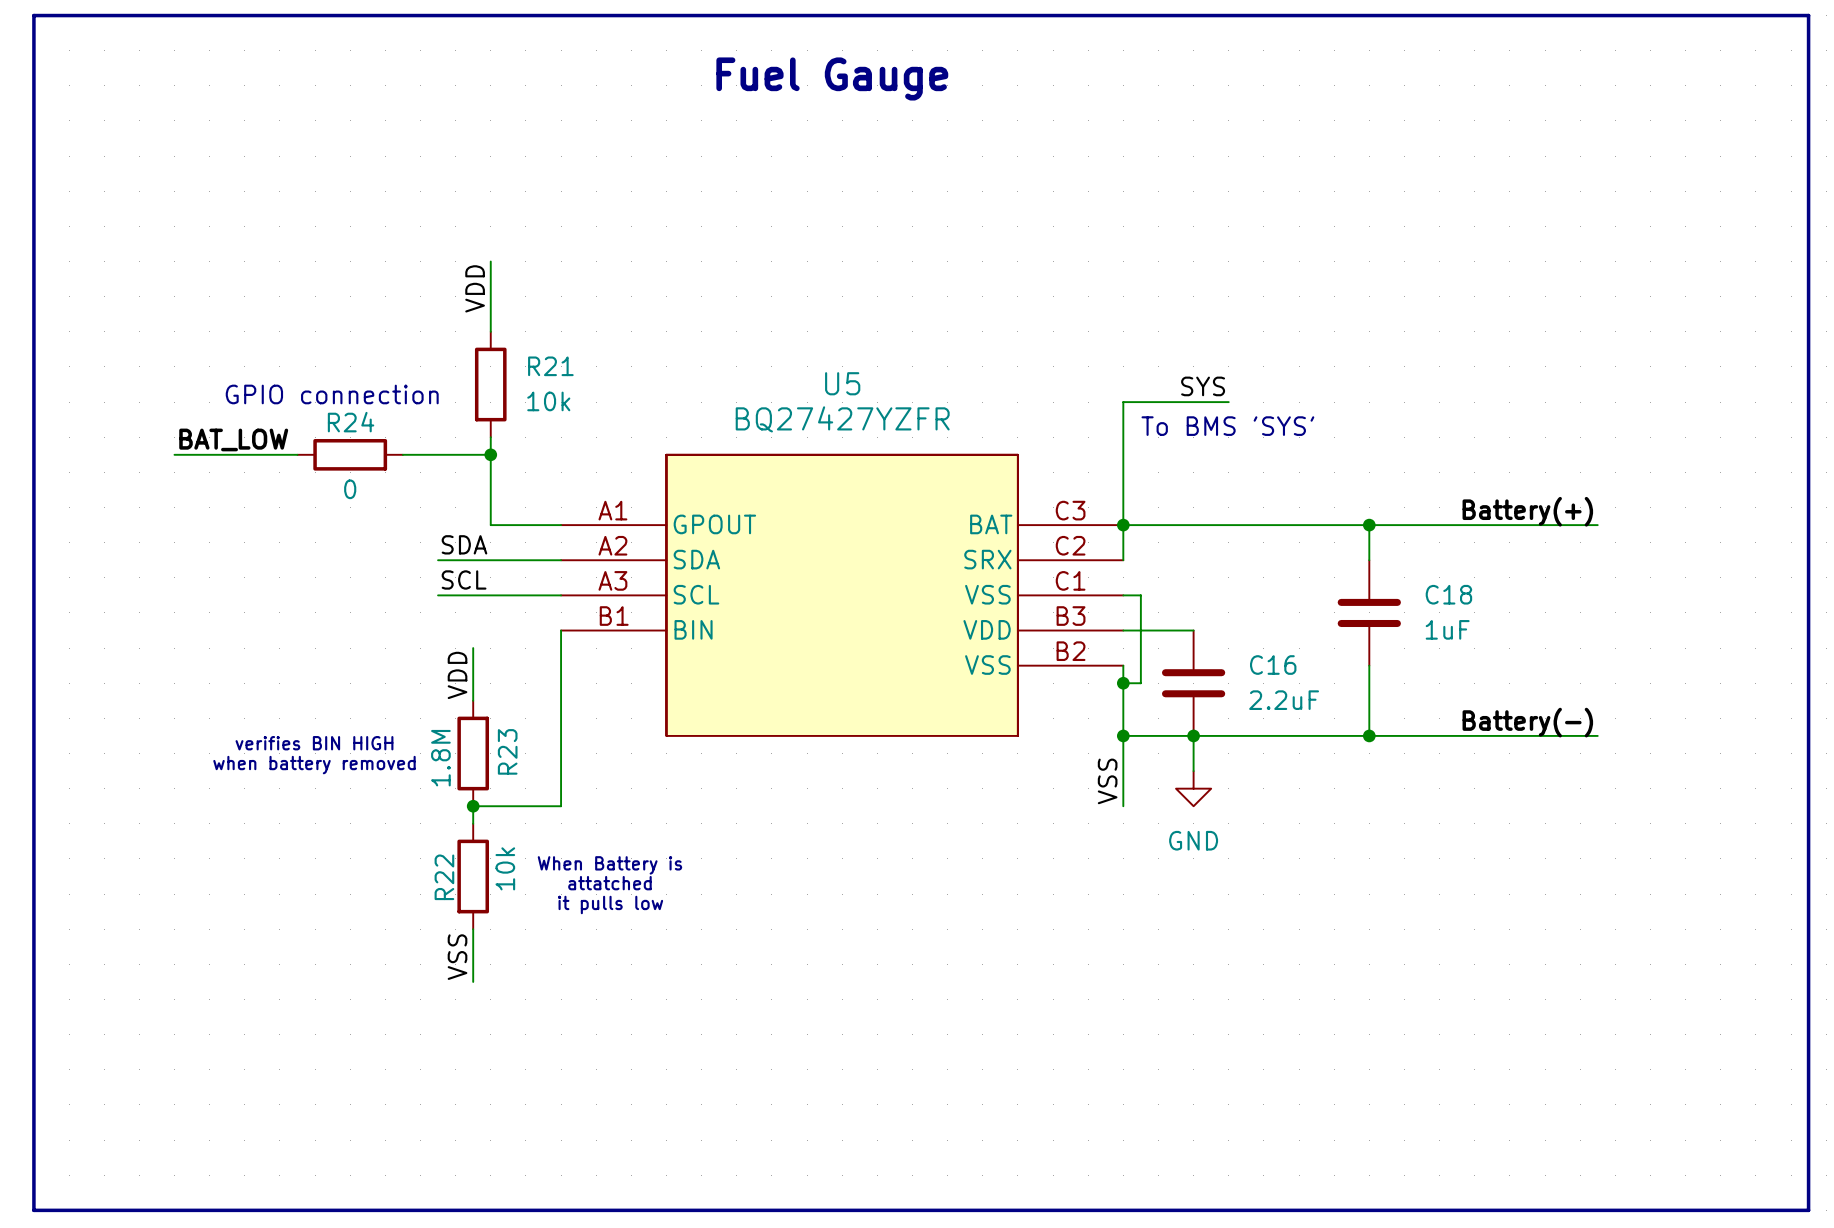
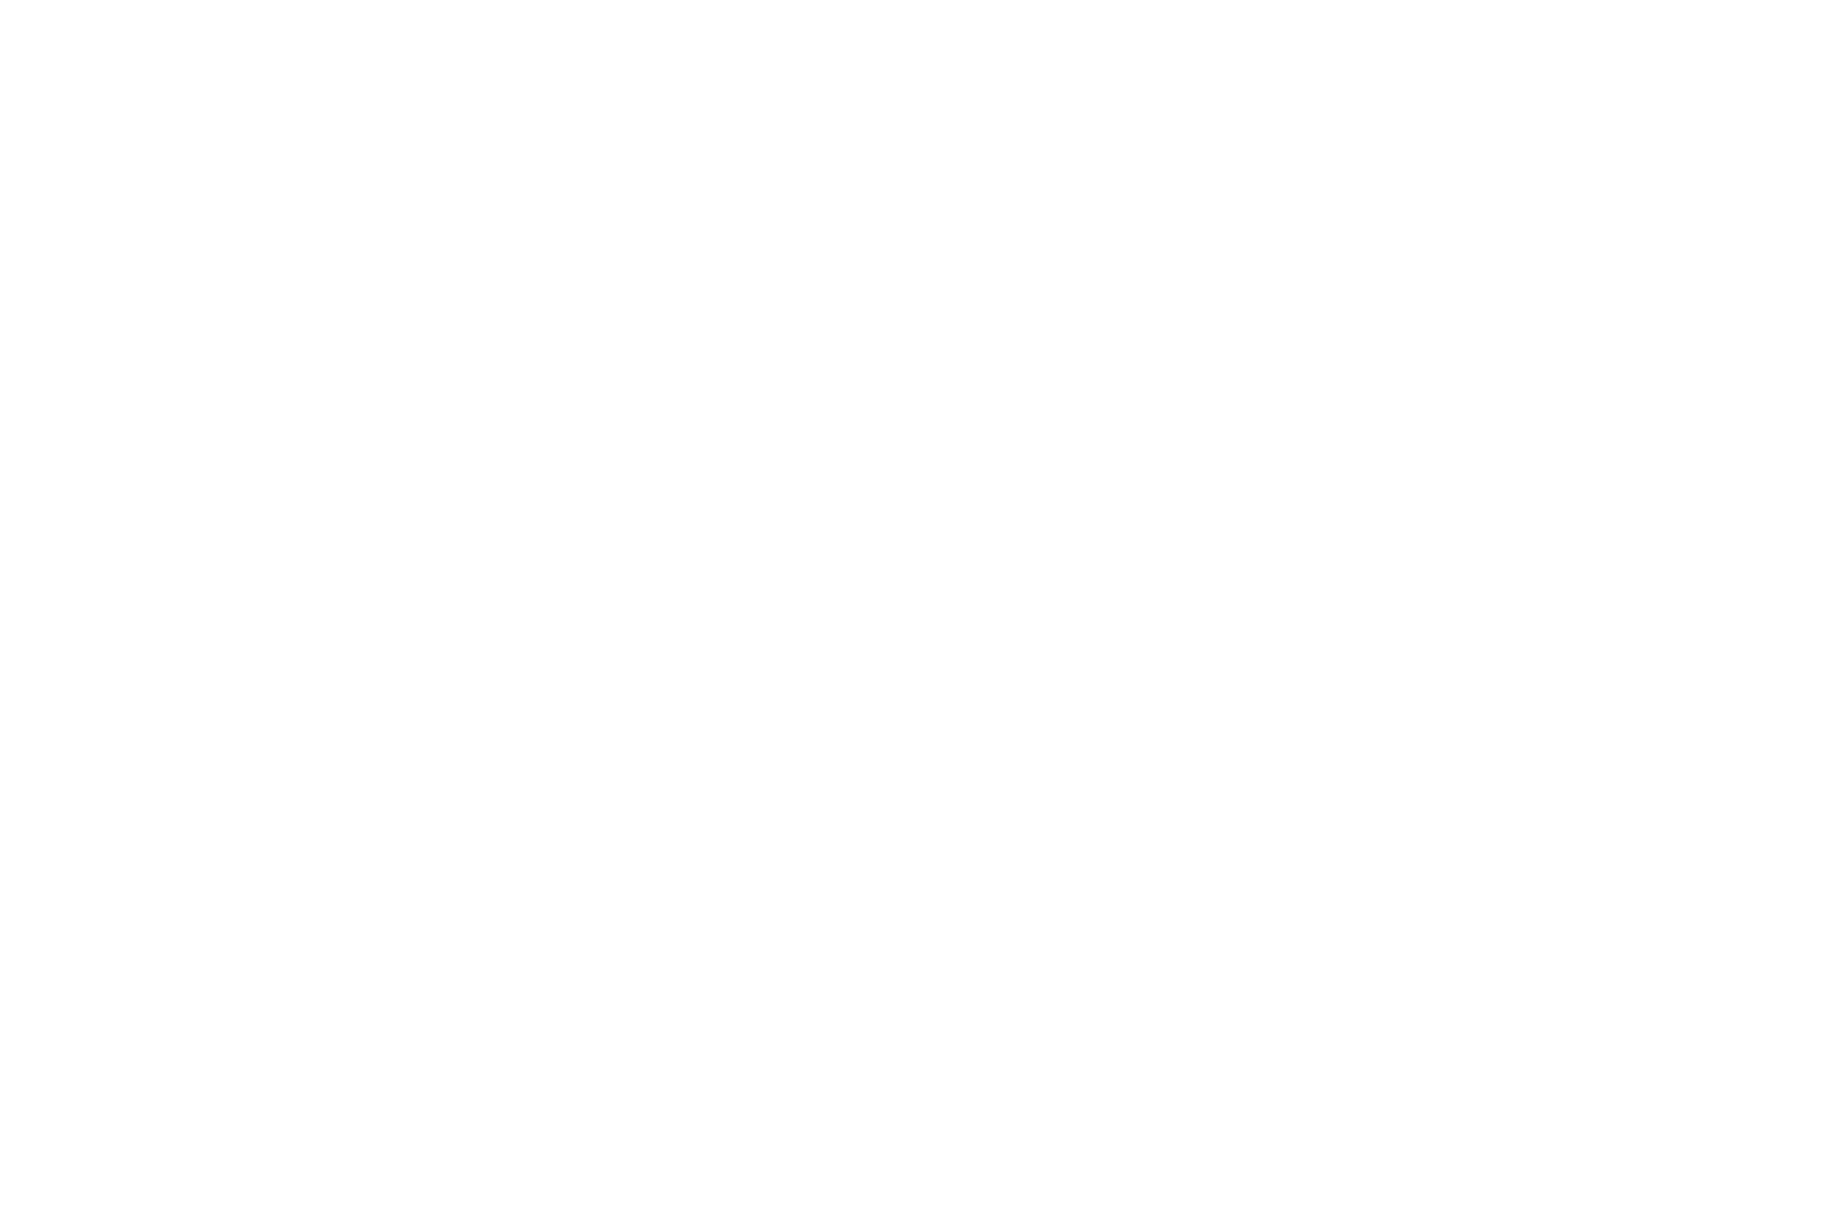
line: (33, 15) (1808, 15) (1808, 1210) (33, 1210) (33, 15) -> none
text: Fuel Gauge (832, 78) -> none
wire: (490, 261) (490, 331) -> none
label: VDD (475, 288) -> none
R21: 10k (490, 384) -> none
label: SYS (1203, 386) -> none
text: GPIO connection (332, 394) -> none
wire: (1228, 402) (1123, 402) (1123, 560) -> none
text: To BMS 'SYS' (1227, 426) -> none
wire: (490, 437) (490, 525) (561, 525) -> none
label: BAT_LOW (233, 439) -> none
wire: (174, 454) (297, 454) -> none
R24: 0 (350, 454) -> none
wire: (402, 454) (490, 454) -> none
junction: (490, 454) -> none
label: Battery(+) (1527, 511) -> none
wire: (1123, 525) (1597, 525) -> none
junction: (1123, 525) -> none
wire: (1369, 525) (1369, 560) -> none
junction: (1369, 525) -> none
label: SDA (464, 544) -> none
wire: (438, 560) (561, 560) -> none
label: SCL (464, 579) -> none
wire: (438, 595) (561, 595) -> none
U5: BQ27427YZFR (842, 595) -> none
wire: (1123, 595) (1140, 595) (1140, 683) (1123, 683) -> none
C18: 1uF (1369, 612) -> none
wire: (561, 630) (561, 806) (473, 806) (473, 823) -> none
wire: (1123, 630) (1193, 630) -> none
wire: (473, 648) (473, 700) -> none
wire: (1123, 665) (1123, 806) -> none
wire: (1369, 665) (1369, 735) -> none
label: VDD (457, 675) -> none
junction: (1123, 683) -> none
C16: 2.2uF (1193, 683) -> none
label: Battery(-) (1527, 722) -> none
wire: (1123, 735) (1597, 735) -> none
junction: (1123, 735) -> none
wire: (1193, 735) (1193, 771) -> none
junction: (1193, 735) -> none
junction: (1369, 735) -> none
text: verifies BIN HIGH (314, 743) -> none
R23: 1.8M (473, 753) -> none
text: when battery removed (314, 765) -> none
label: VSS (1107, 781) -> none
power symbol: GND (1193, 788) -> none
junction: (473, 806) -> none
text: When Battery is (609, 865) -> none
R22: 10k (473, 876) -> none
text: attatched (609, 883) -> none
text: it pulls low (610, 904) -> none
wire: (473, 929) (473, 981) -> none
label: VSS (457, 957) -> none

